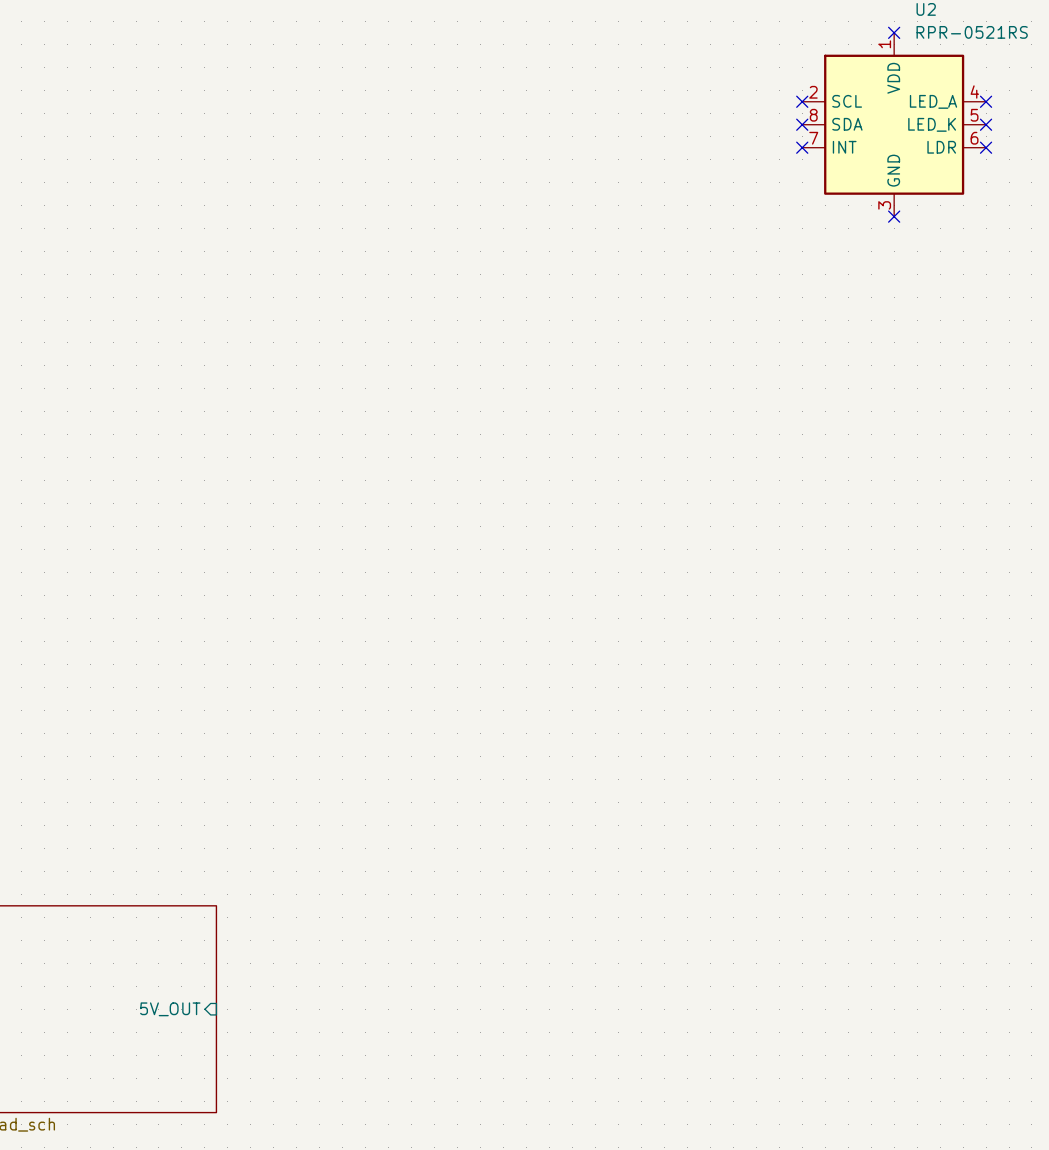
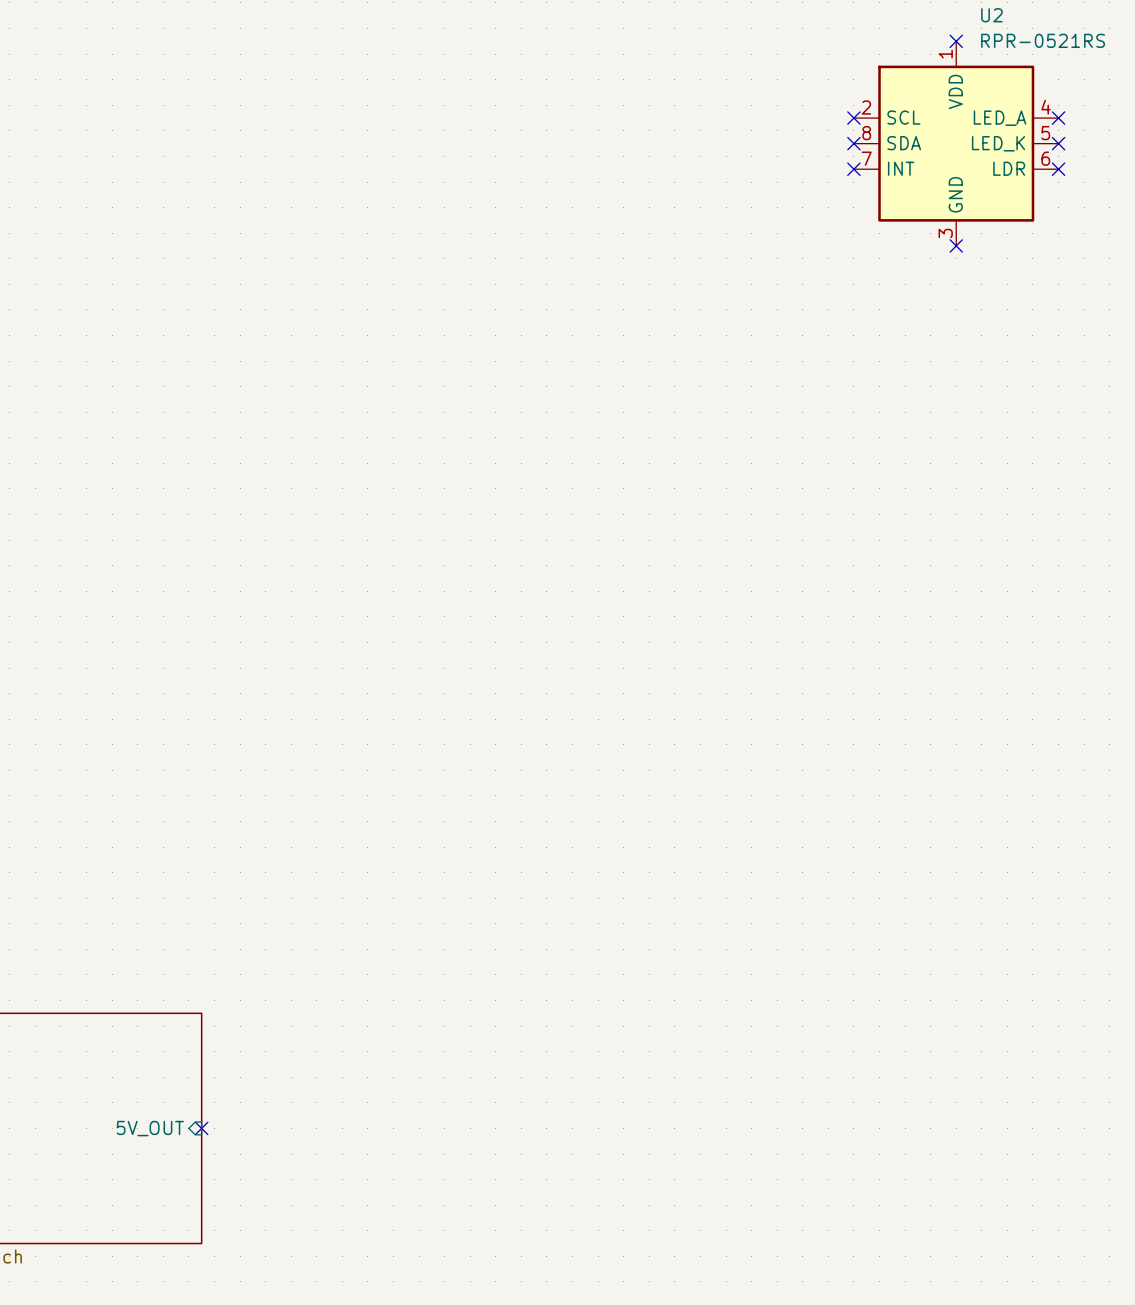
no-connect mark: none -> (201, 1128)

